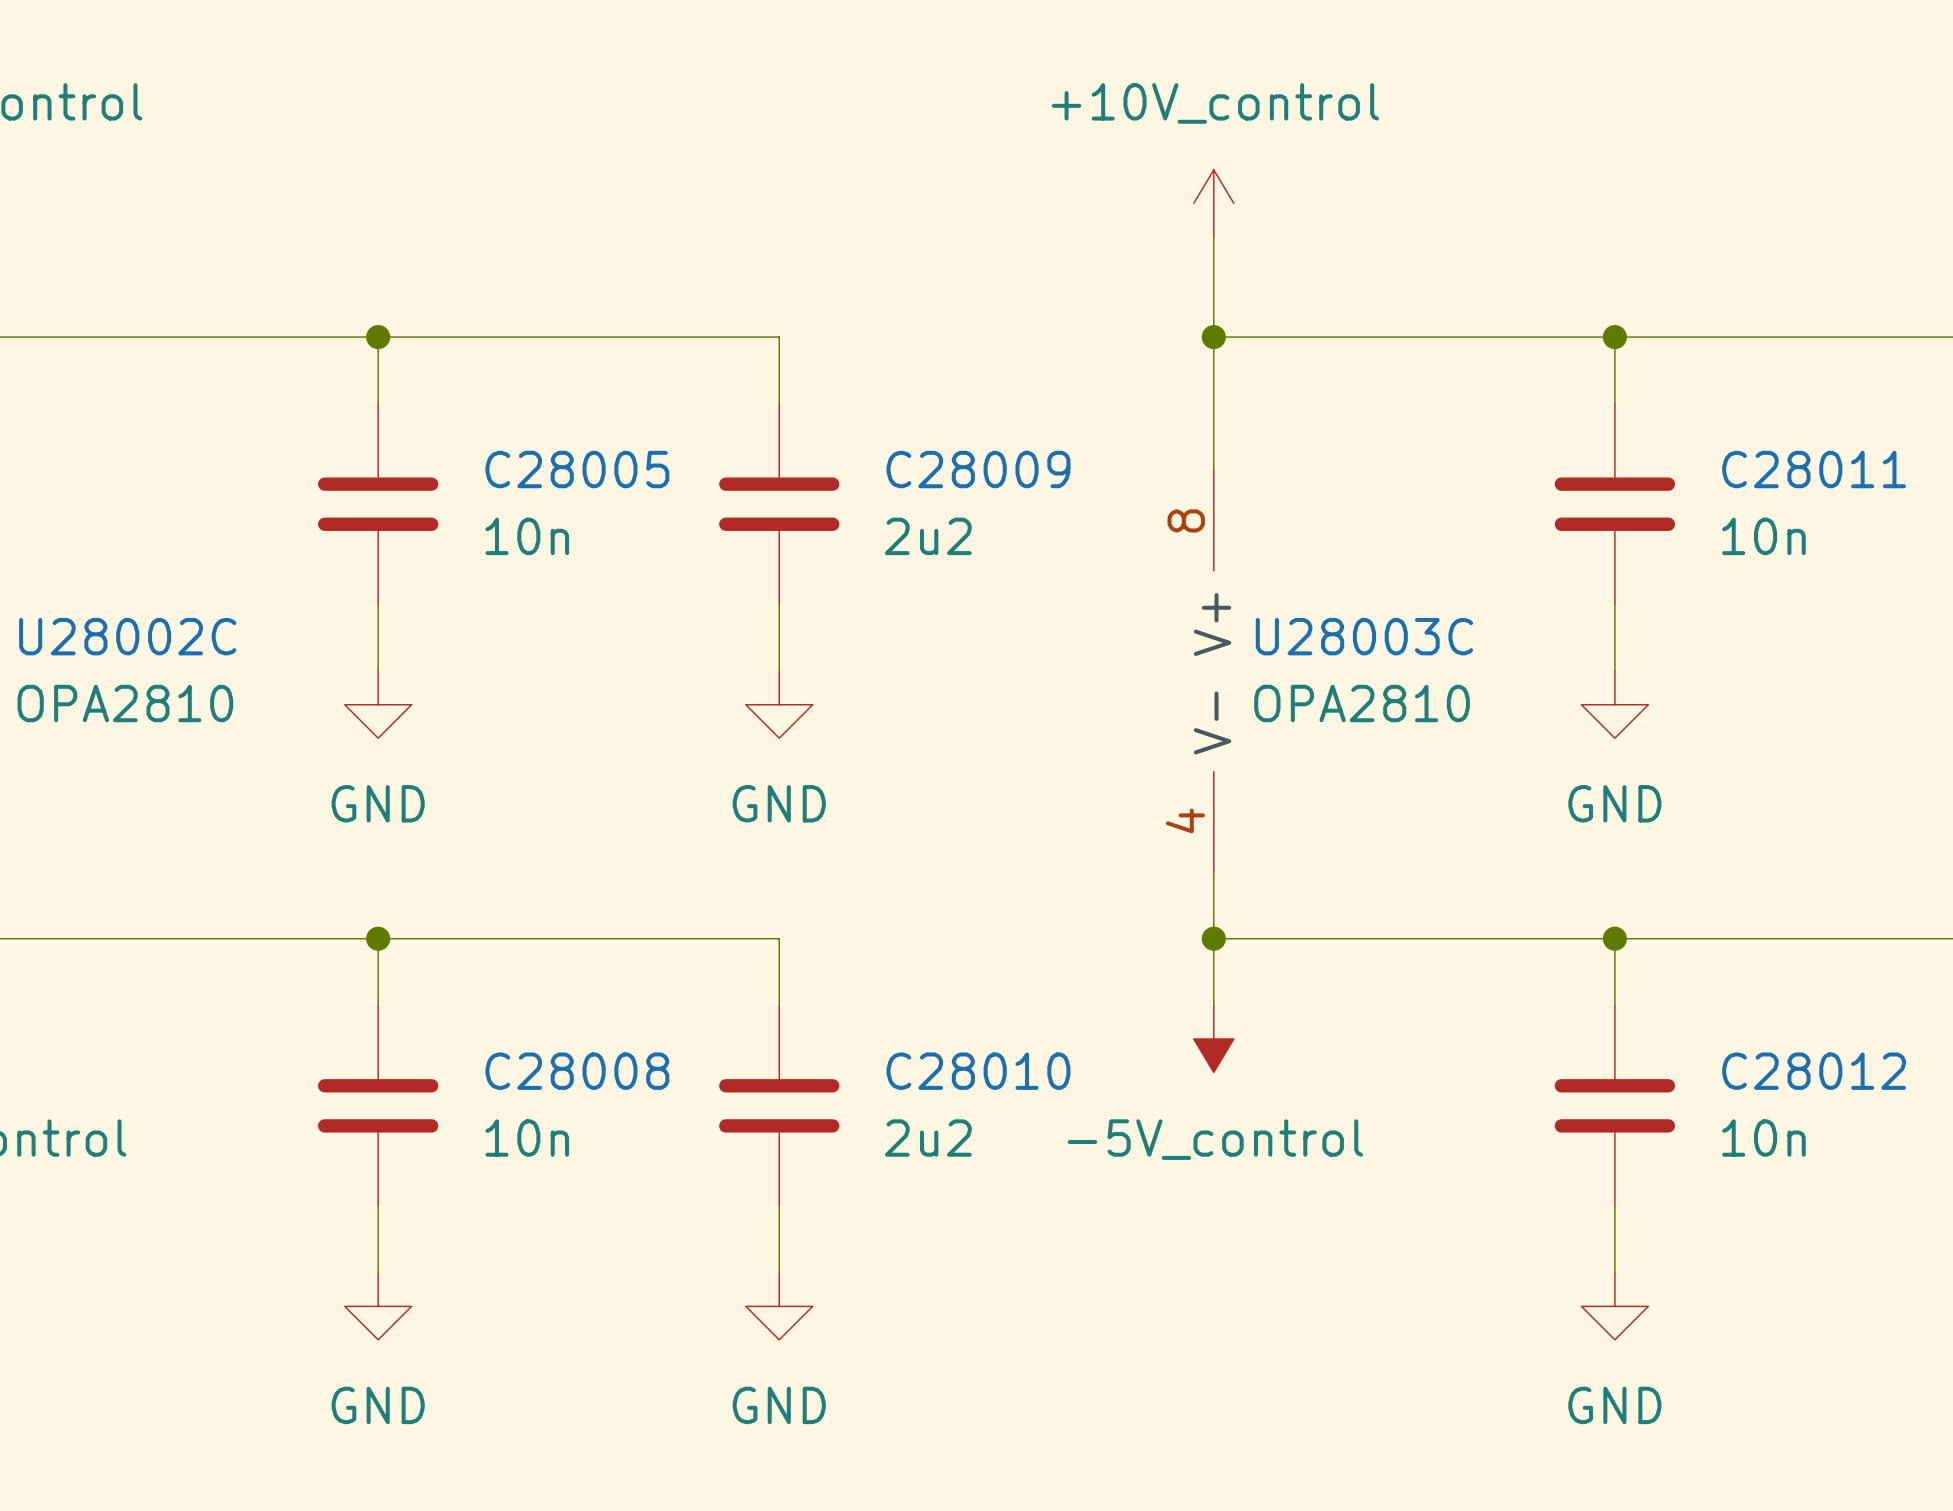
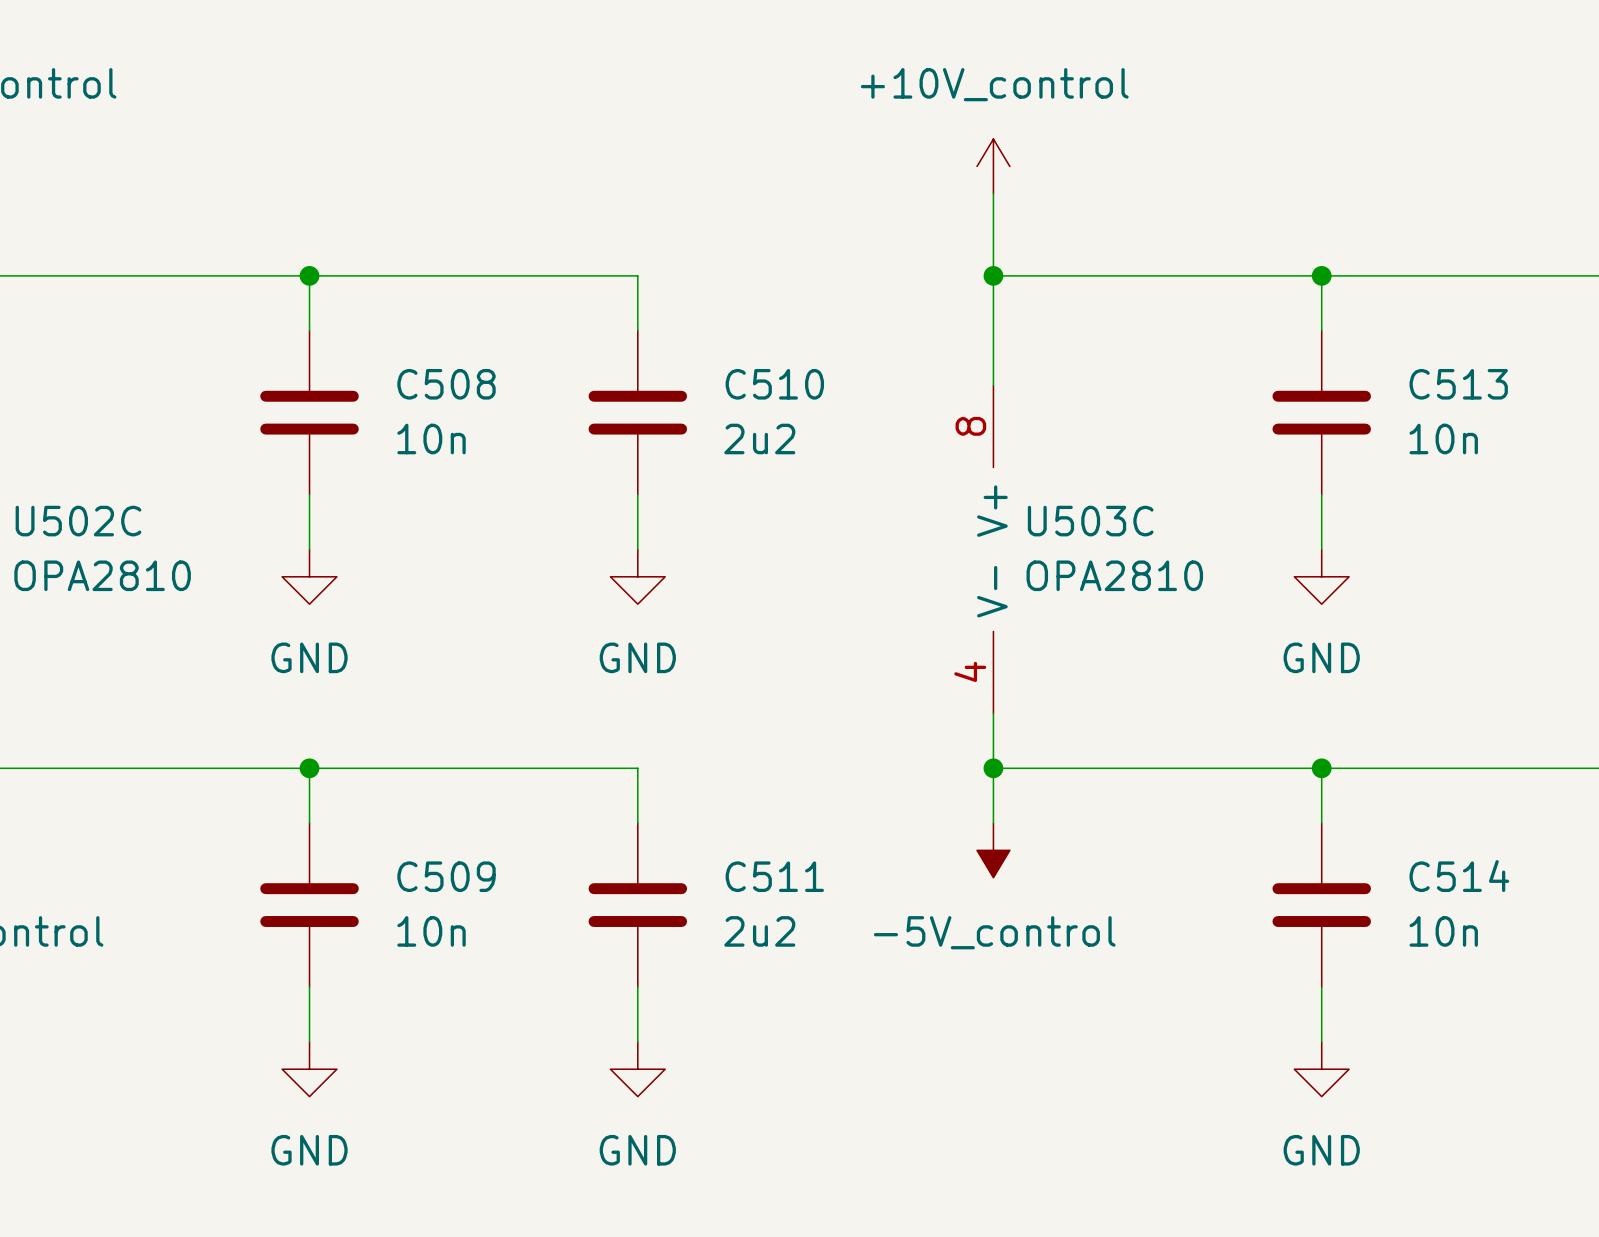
C28005 name: C28005 (577, 469) -> C508 (446, 384)
C28009 name: C28009 (978, 469) -> C510 (774, 384)
C28011 name: C28011 (1814, 469) -> C513 (1458, 384)
U28002C name: U28002C (127, 636) -> U502C (78, 521)
U28003C name: U28003C (1364, 636) -> U503C (1090, 521)
C28008 name: C28008 (577, 1071) -> C509 (446, 876)
C28010 name: C28010 (978, 1071) -> C511 (774, 876)
C28012 name: C28012 (1814, 1071) -> C514 (1459, 876)

